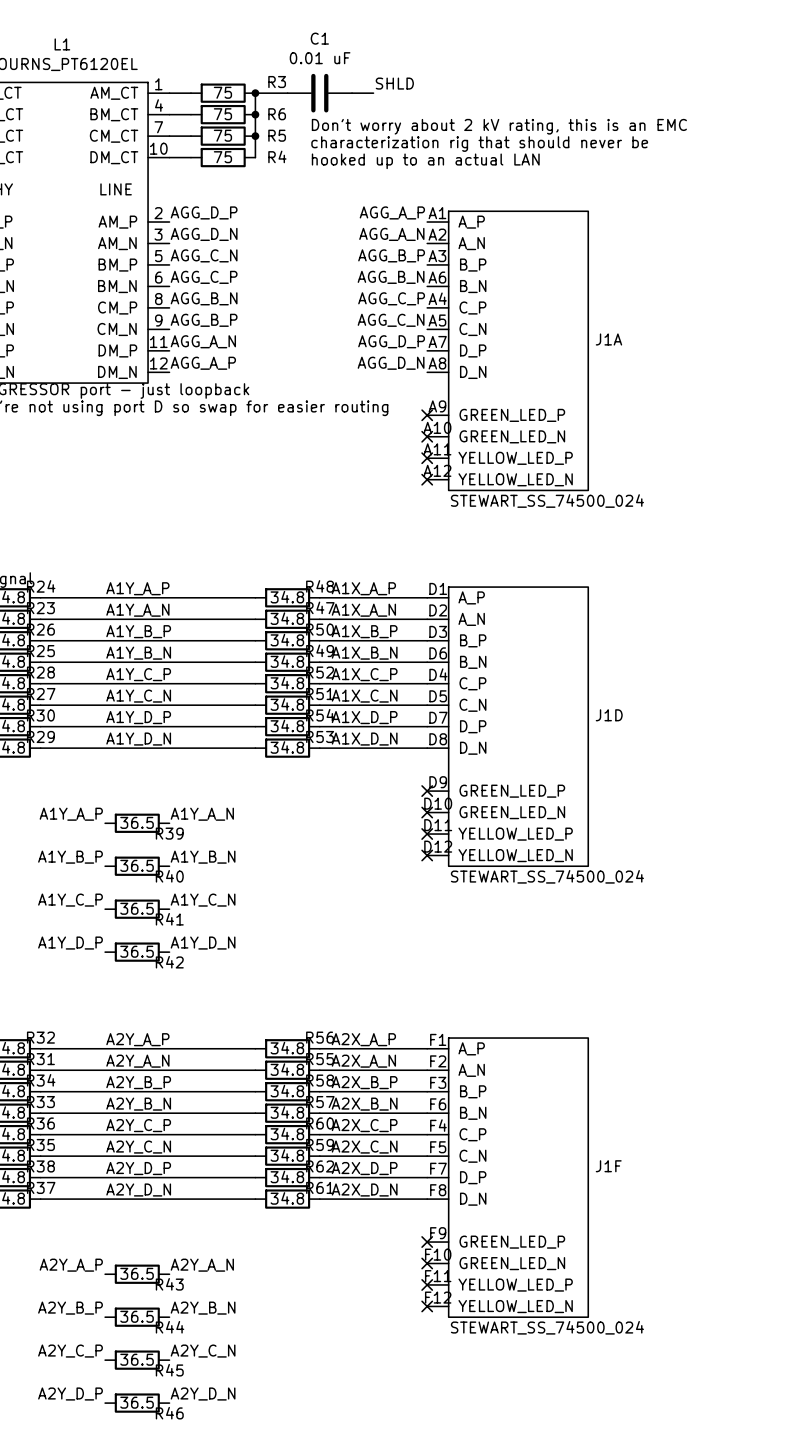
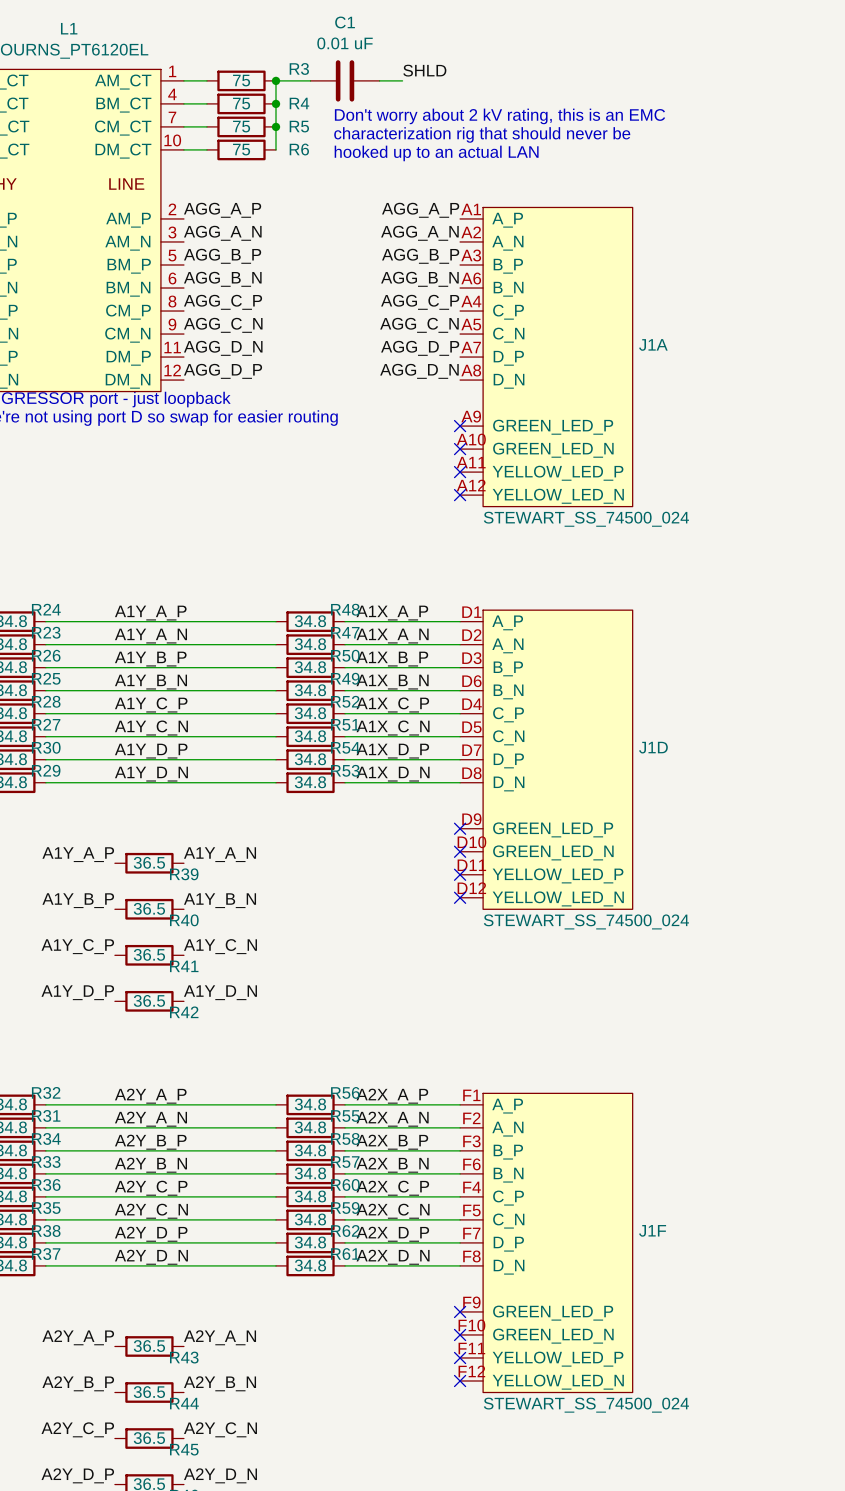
R6 name: R6 (277, 114) -> R4 (299, 103)
R4 name: R4 (277, 156) -> R6 (299, 149)
label: AGG_D_P (204, 212) -> AGG_A_P (222, 210)
label: AGG_D_N (204, 234) -> AGG_A_N (222, 233)
label: AGG_C_N (204, 255) -> AGG_B_P (222, 256)
label: AGG_C_P (204, 277) -> AGG_B_N (222, 279)
label: AGG_B_N (204, 298) -> AGG_C_P (223, 302)
label: AGG_B_P (204, 320) -> AGG_C_N (223, 325)
label: AGG_A_N (203, 341) -> AGG_D_N (223, 348)
label: AGG_A_P (203, 363) -> AGG_D_P (223, 371)

